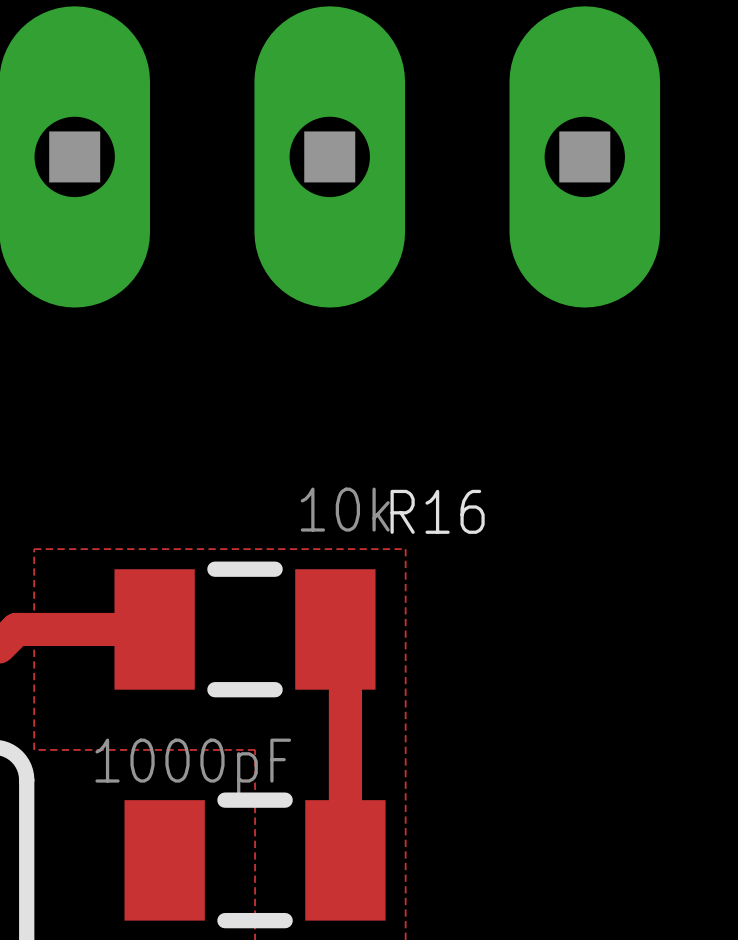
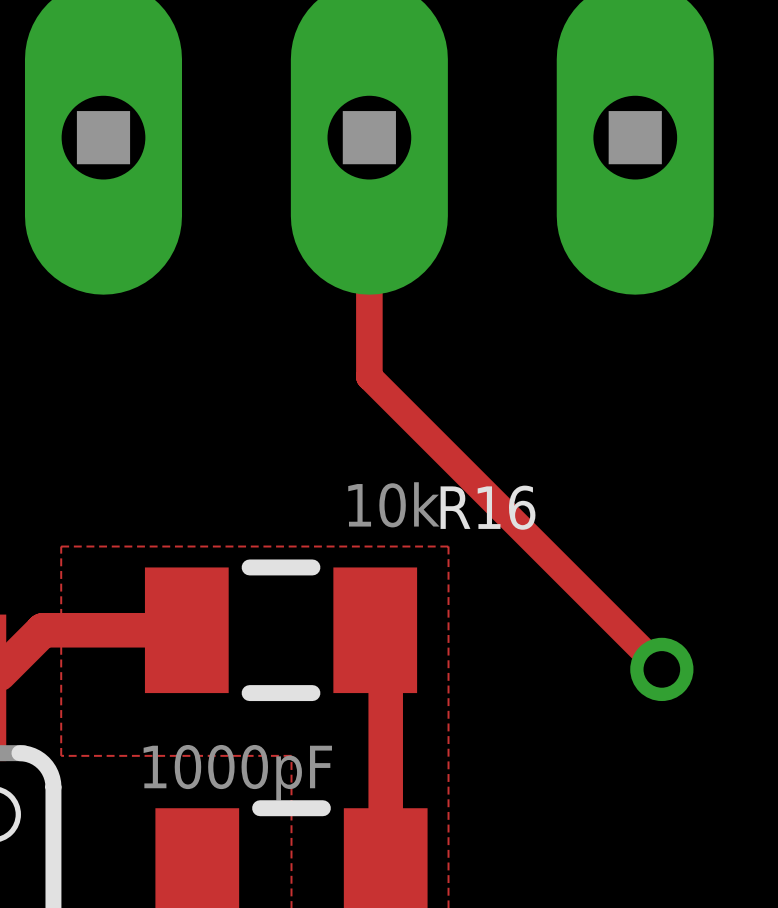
track: none -> (369, 137) (369, 376) (661, 669)
via: none -> (661, 669)

